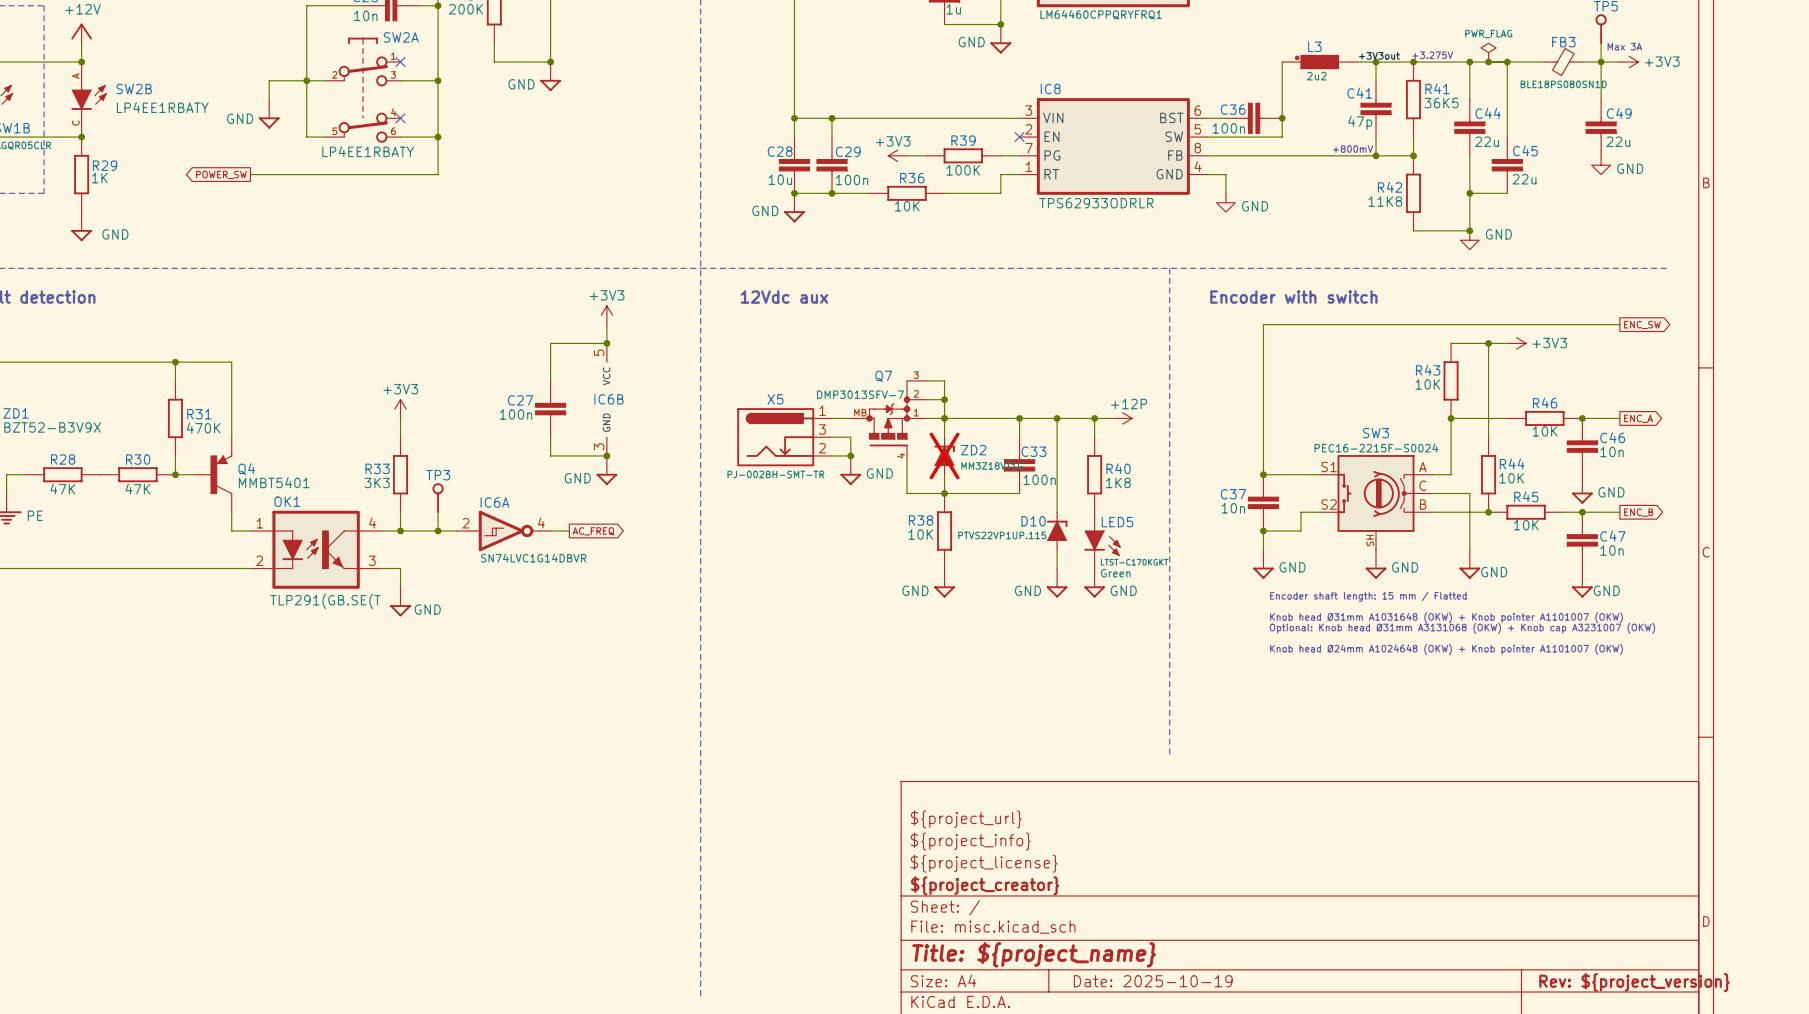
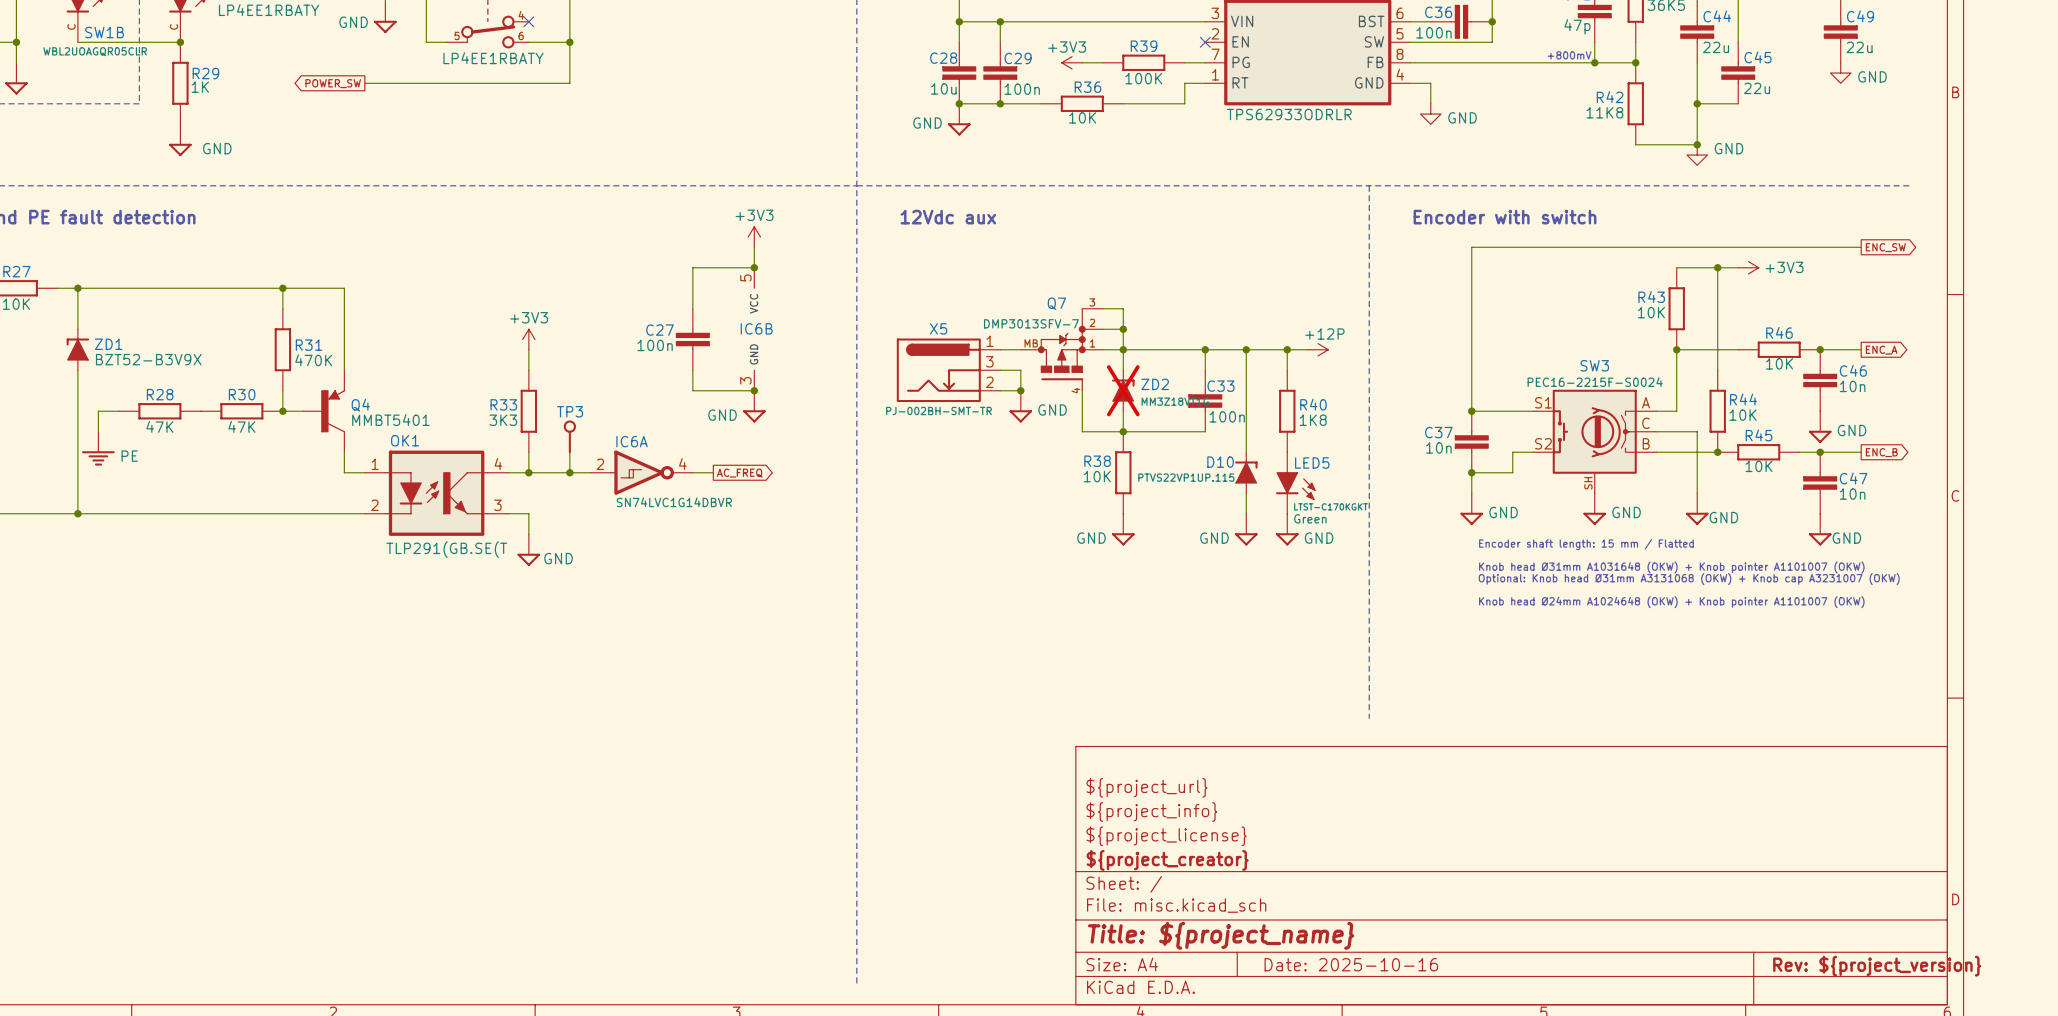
title block: Date: 2025-10-19 (1153, 981) -> Date: 2025-10-16 (1351, 964)

